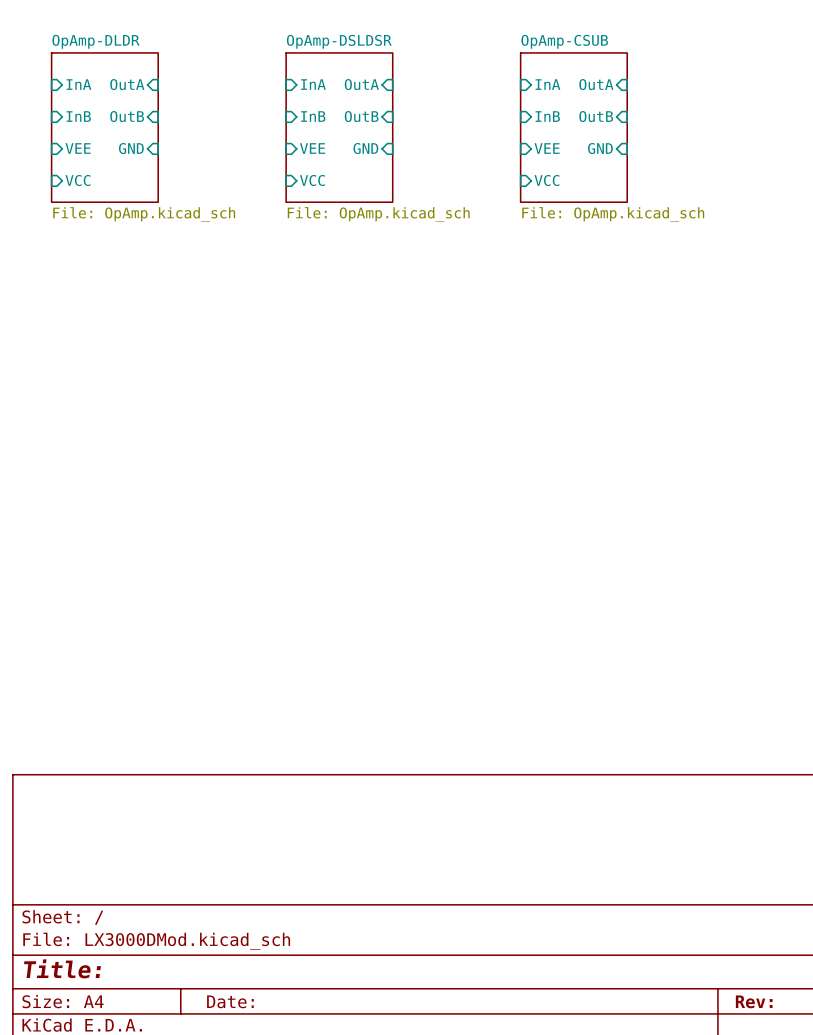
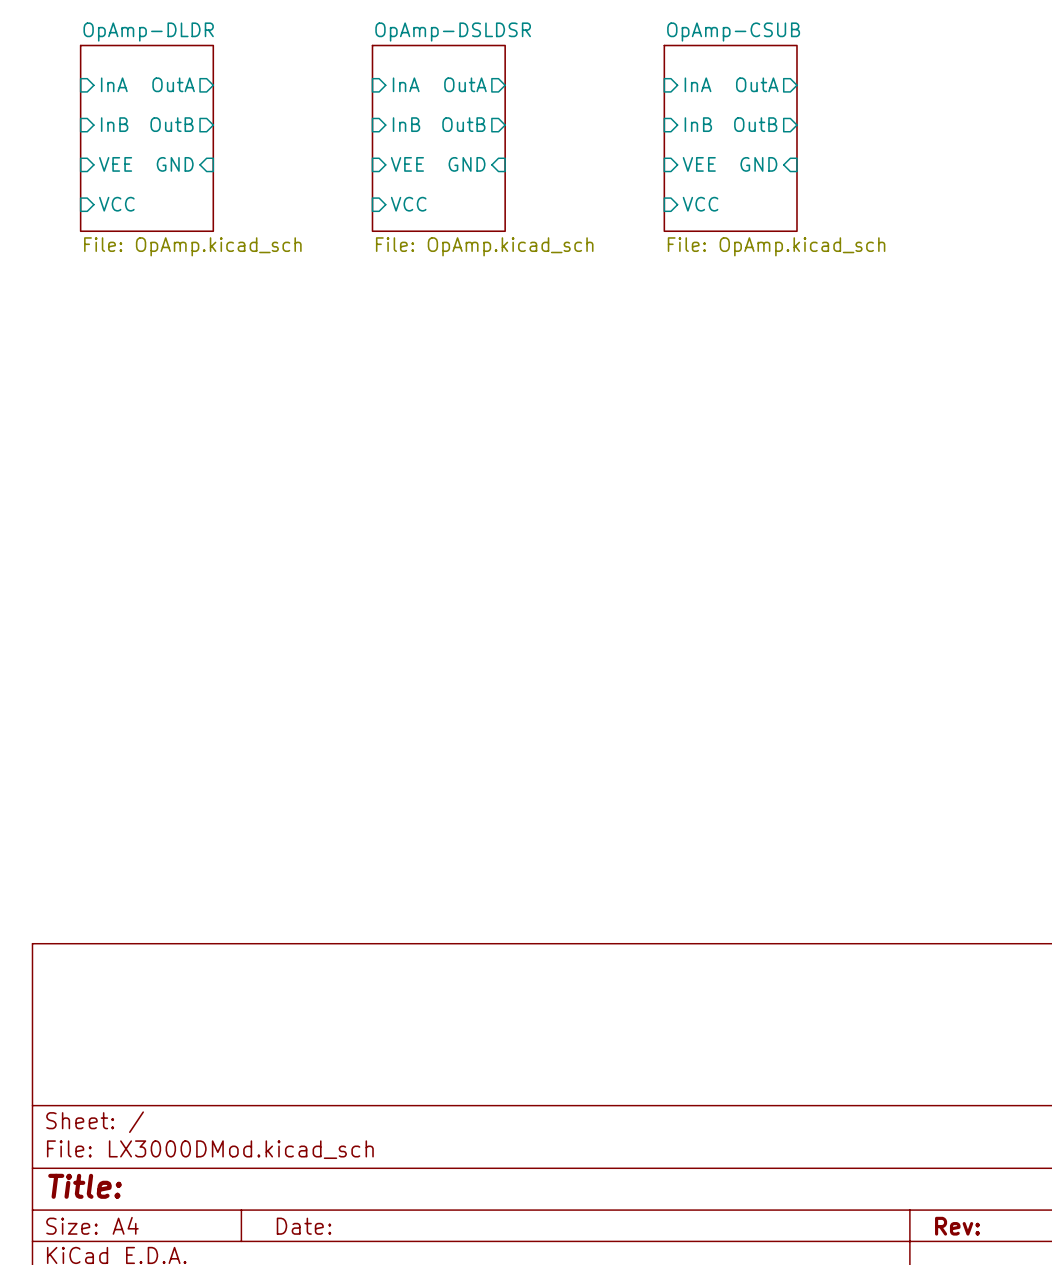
sheet pin shape: input (127, 84) -> output (173, 84)
sheet pin shape: input (361, 84) -> output (465, 84)
sheet pin shape: input (596, 84) -> output (757, 84)
sheet pin shape: input (127, 116) -> output (172, 124)
sheet pin shape: input (361, 116) -> output (463, 124)
sheet pin shape: input (596, 116) -> output (755, 124)

